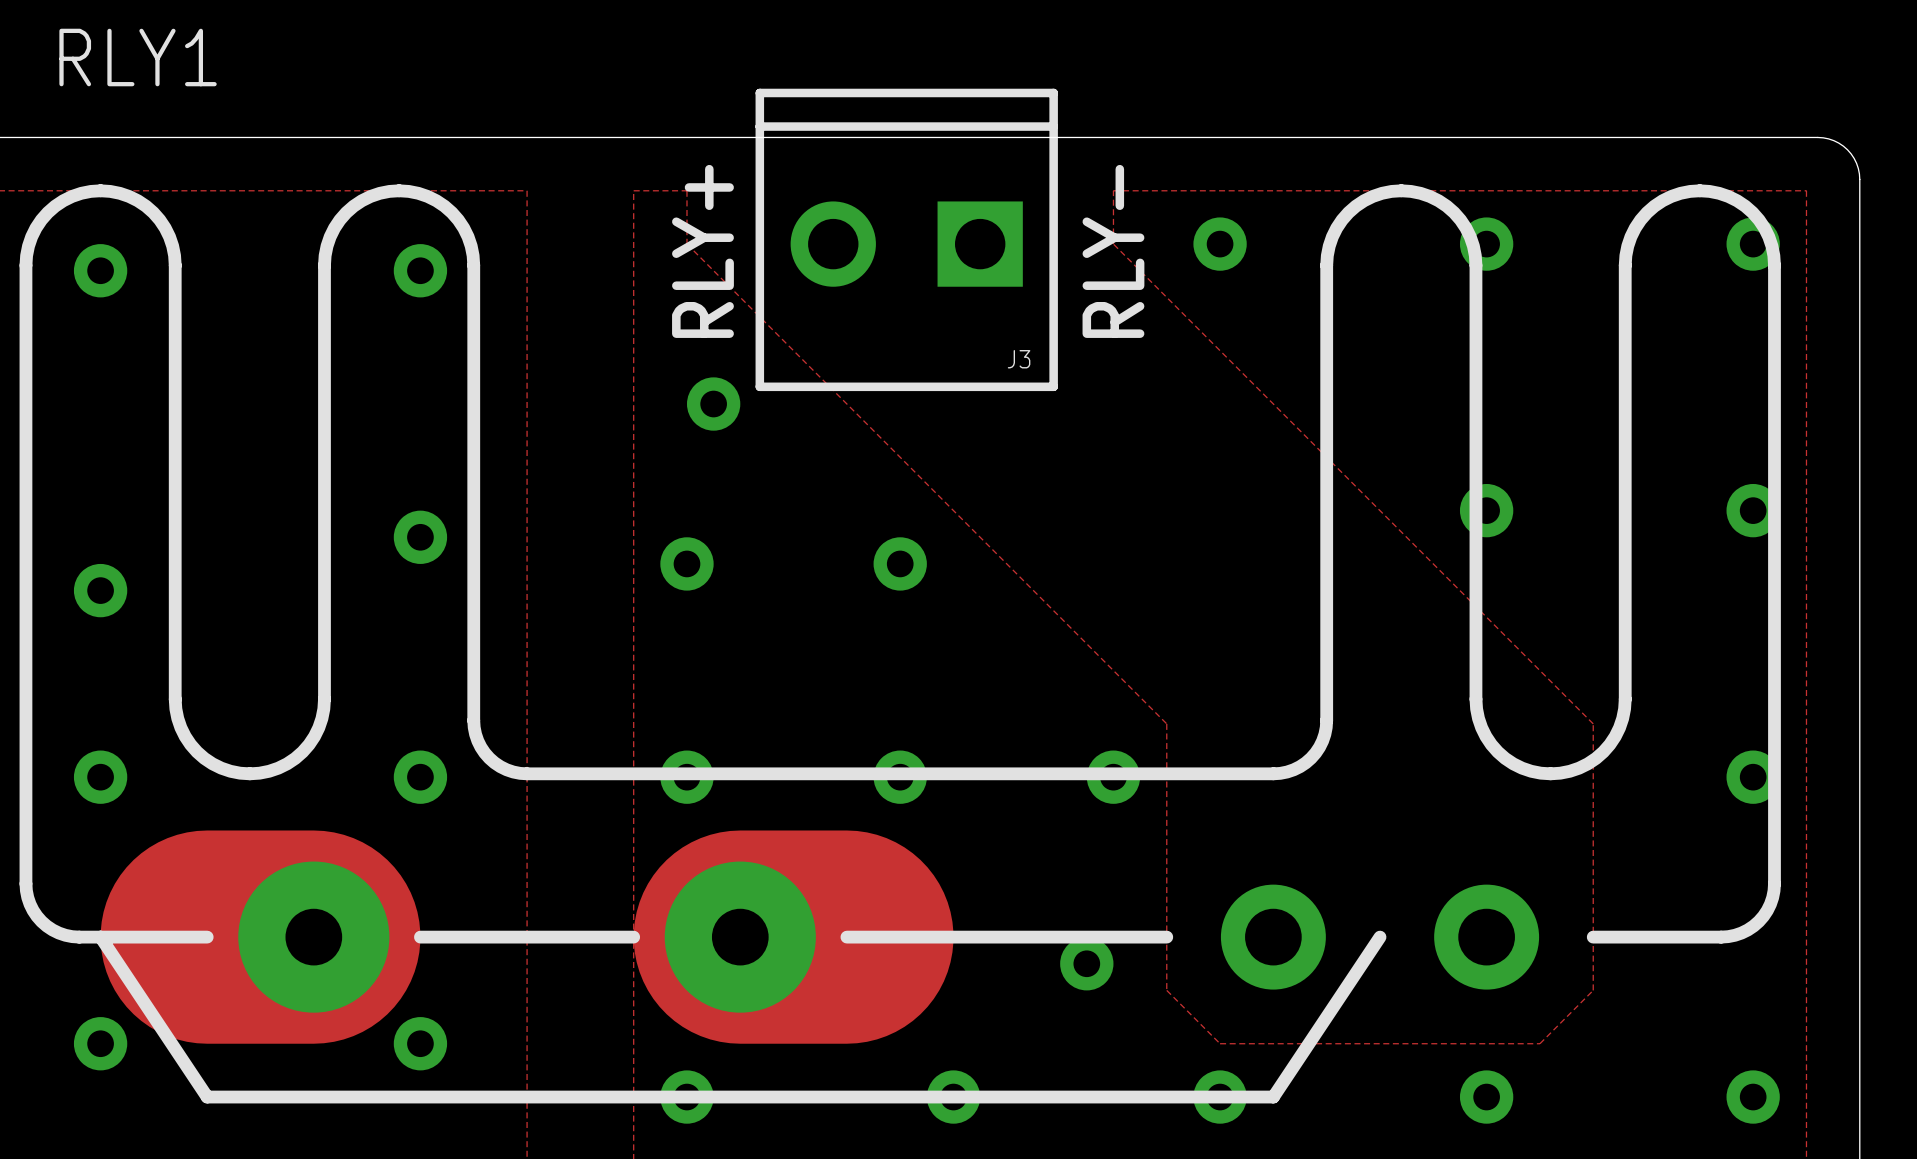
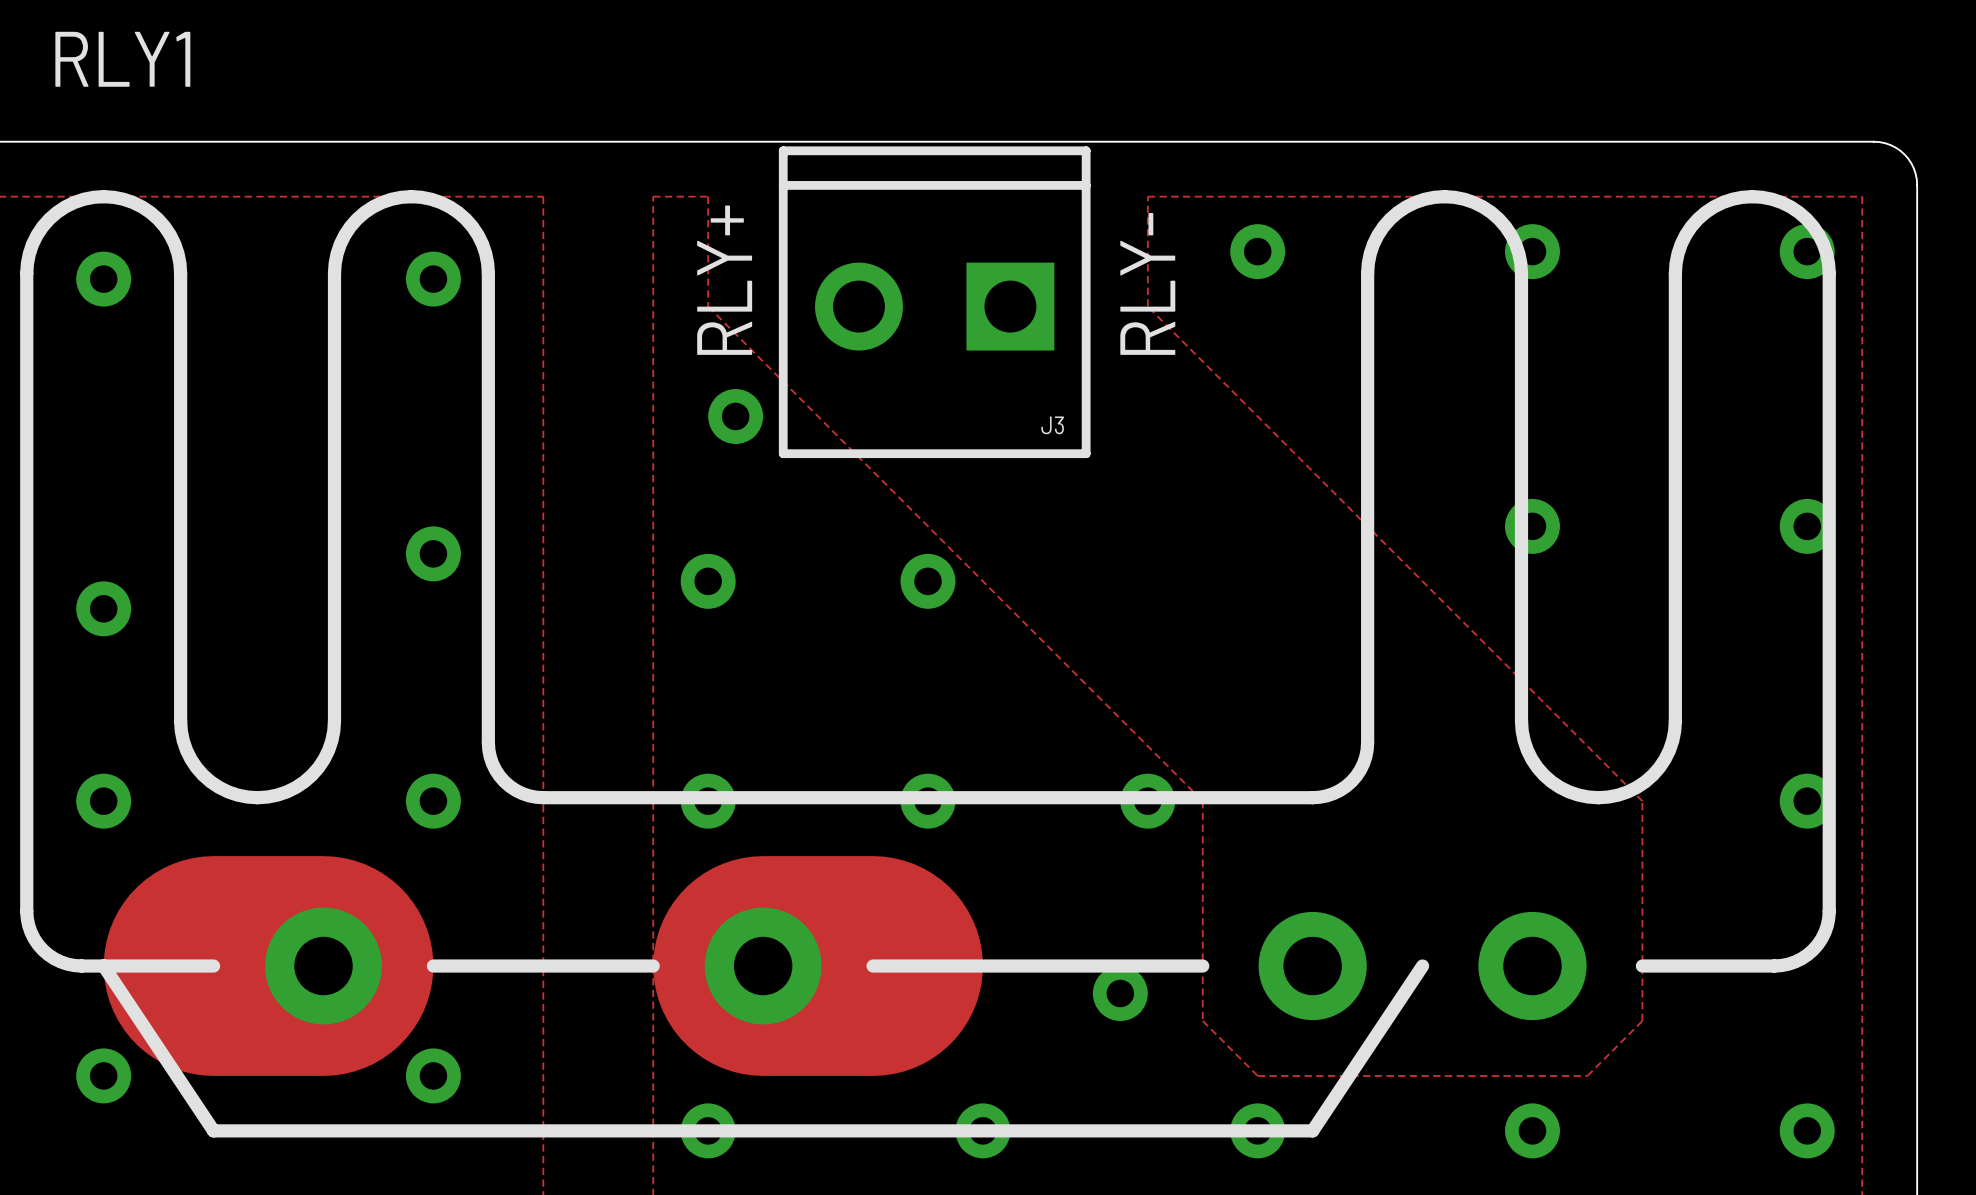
RLY1 footprint: [19, 184, 1781, 1104] -> [20, 190, 1836, 1138]
J3 position: (906, 239) -> (934, 302)
zone outline: (686, 244) (1166, 723) (1166, 777) -> (708, 251) (708, 306) (1202, 801)
zone outline: (1113, 244) (1593, 723) (1593, 777) -> (1147, 251) (1147, 306) (1642, 801)

